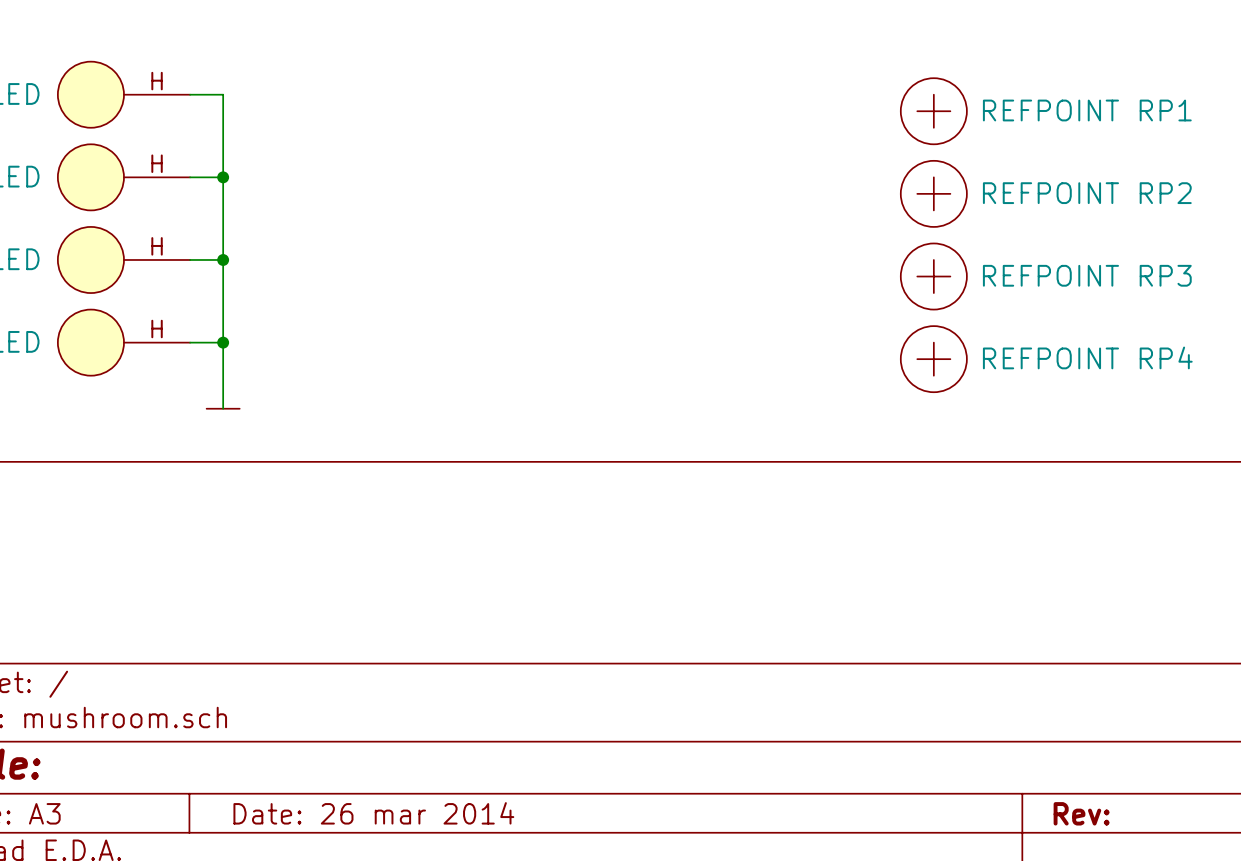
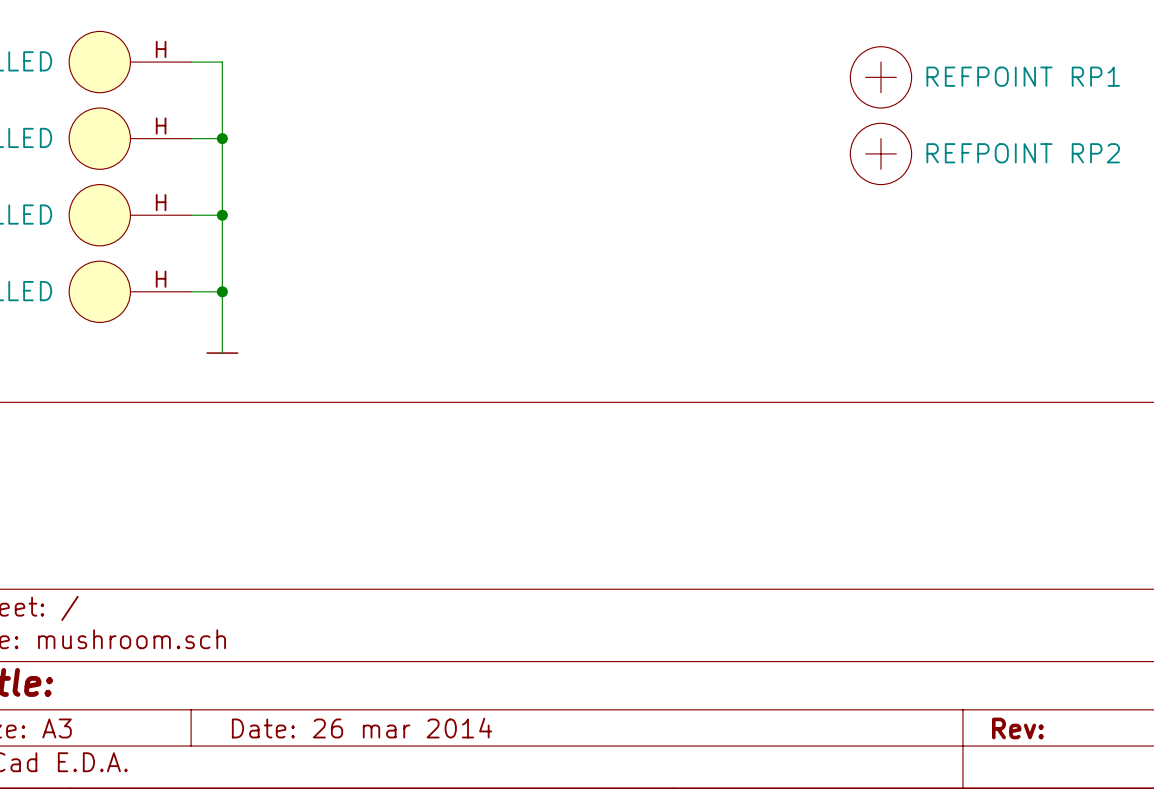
RP3: REFPOINT (933, 276) -> none
RP4: REFPOINT (933, 359) -> none

